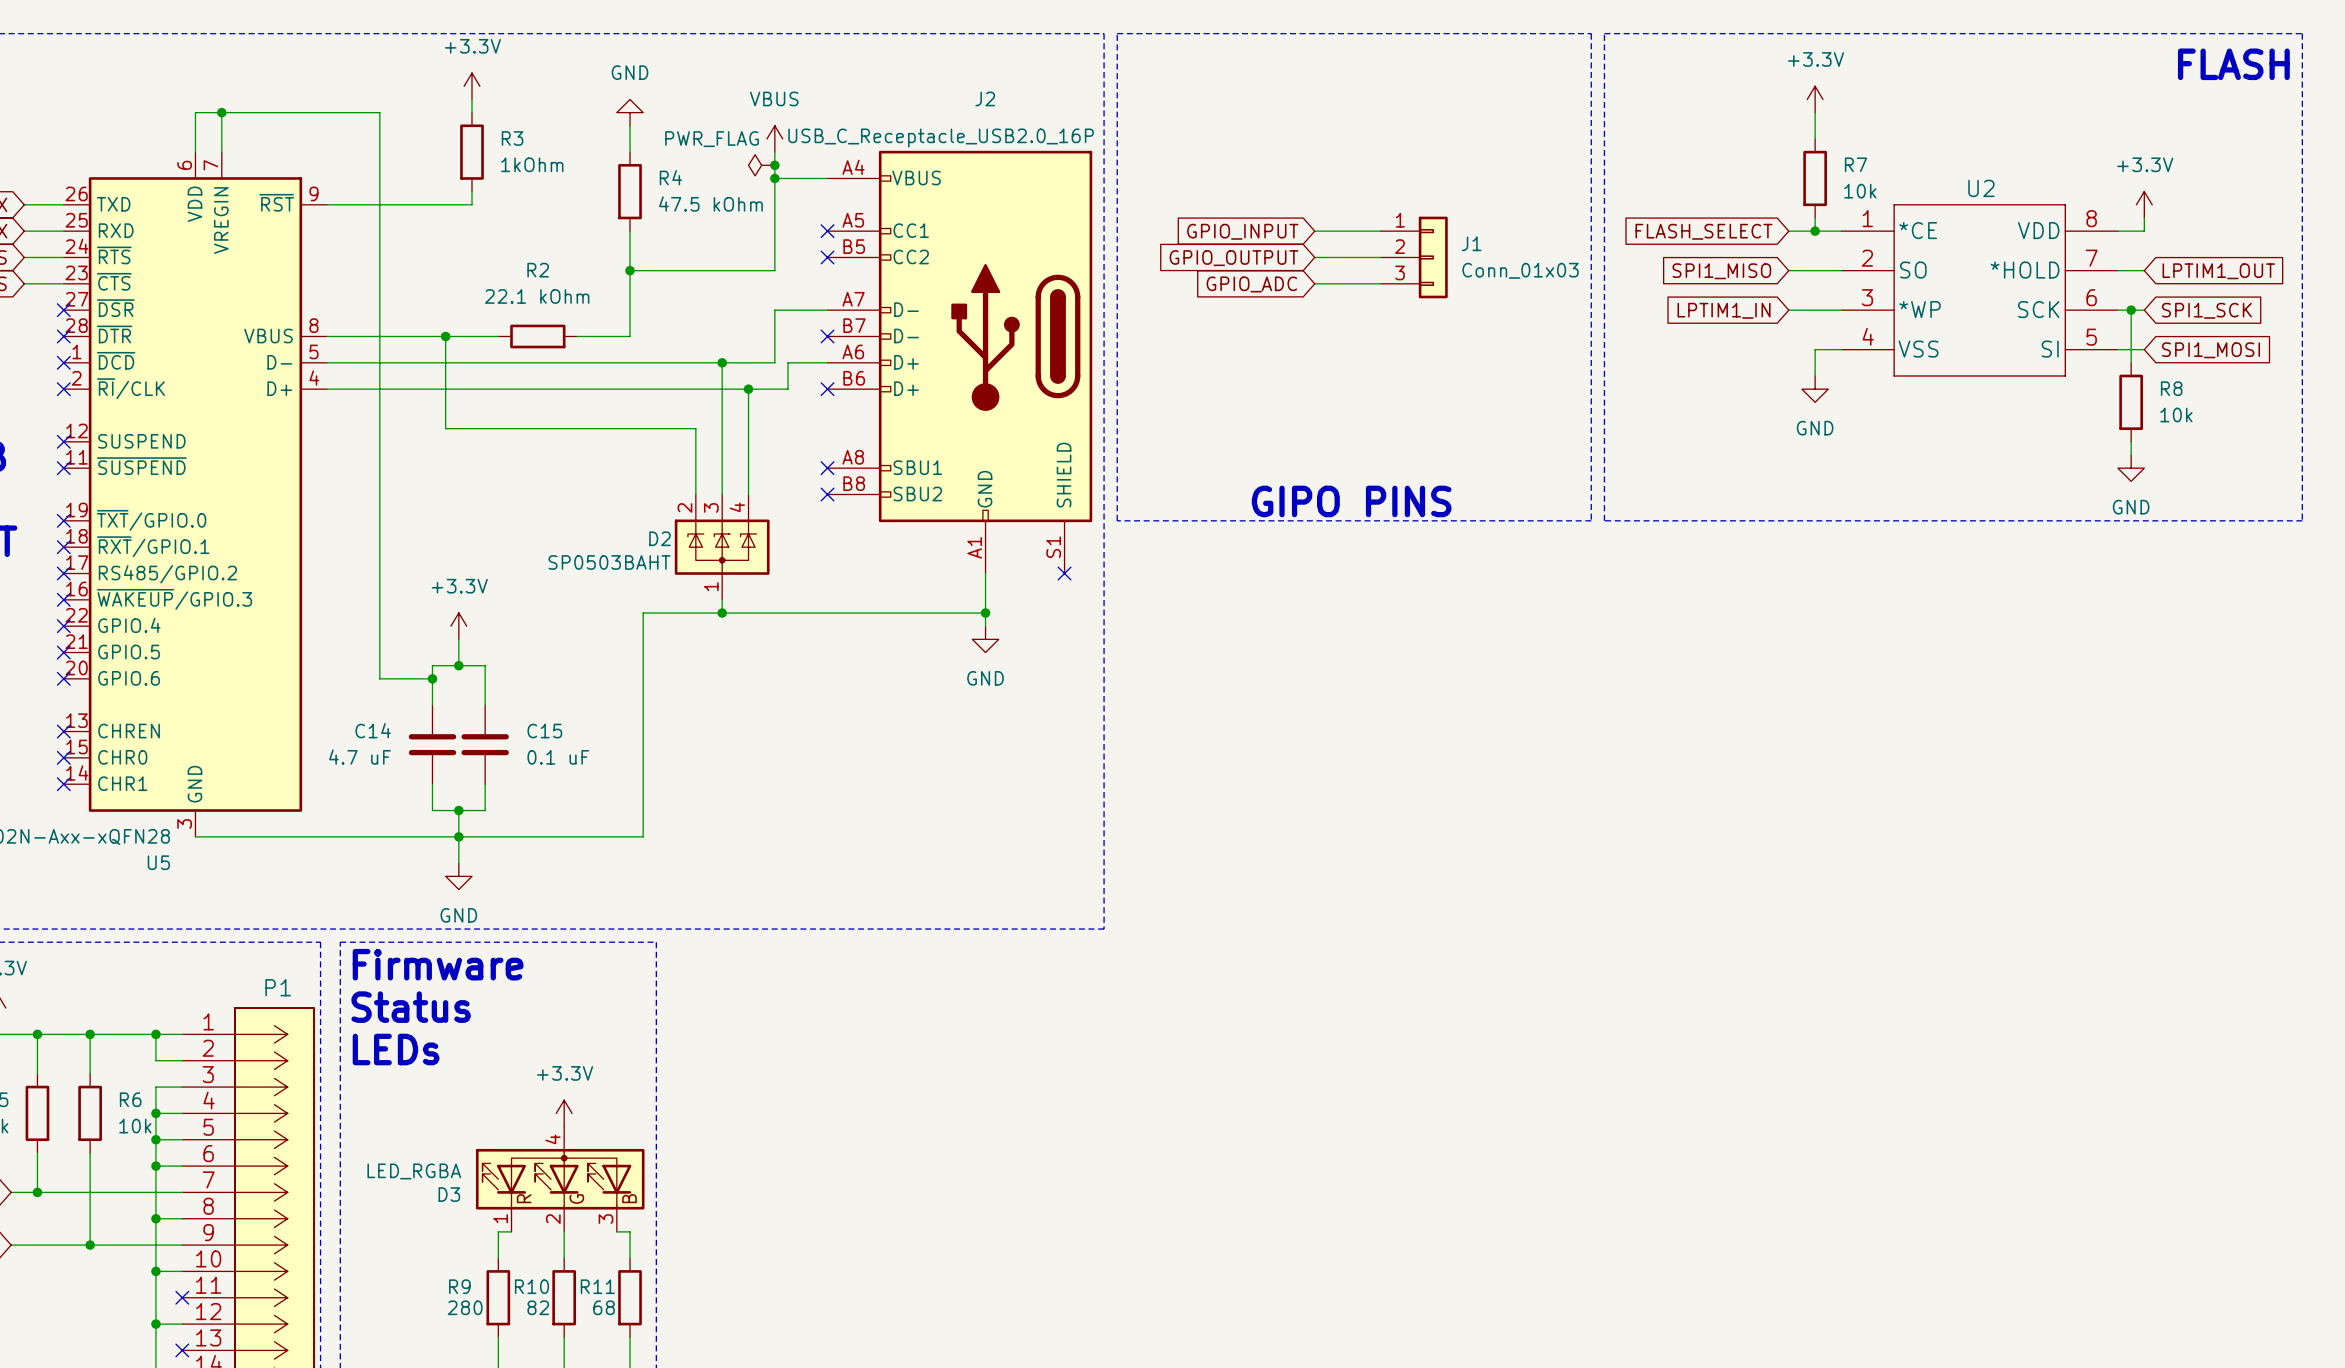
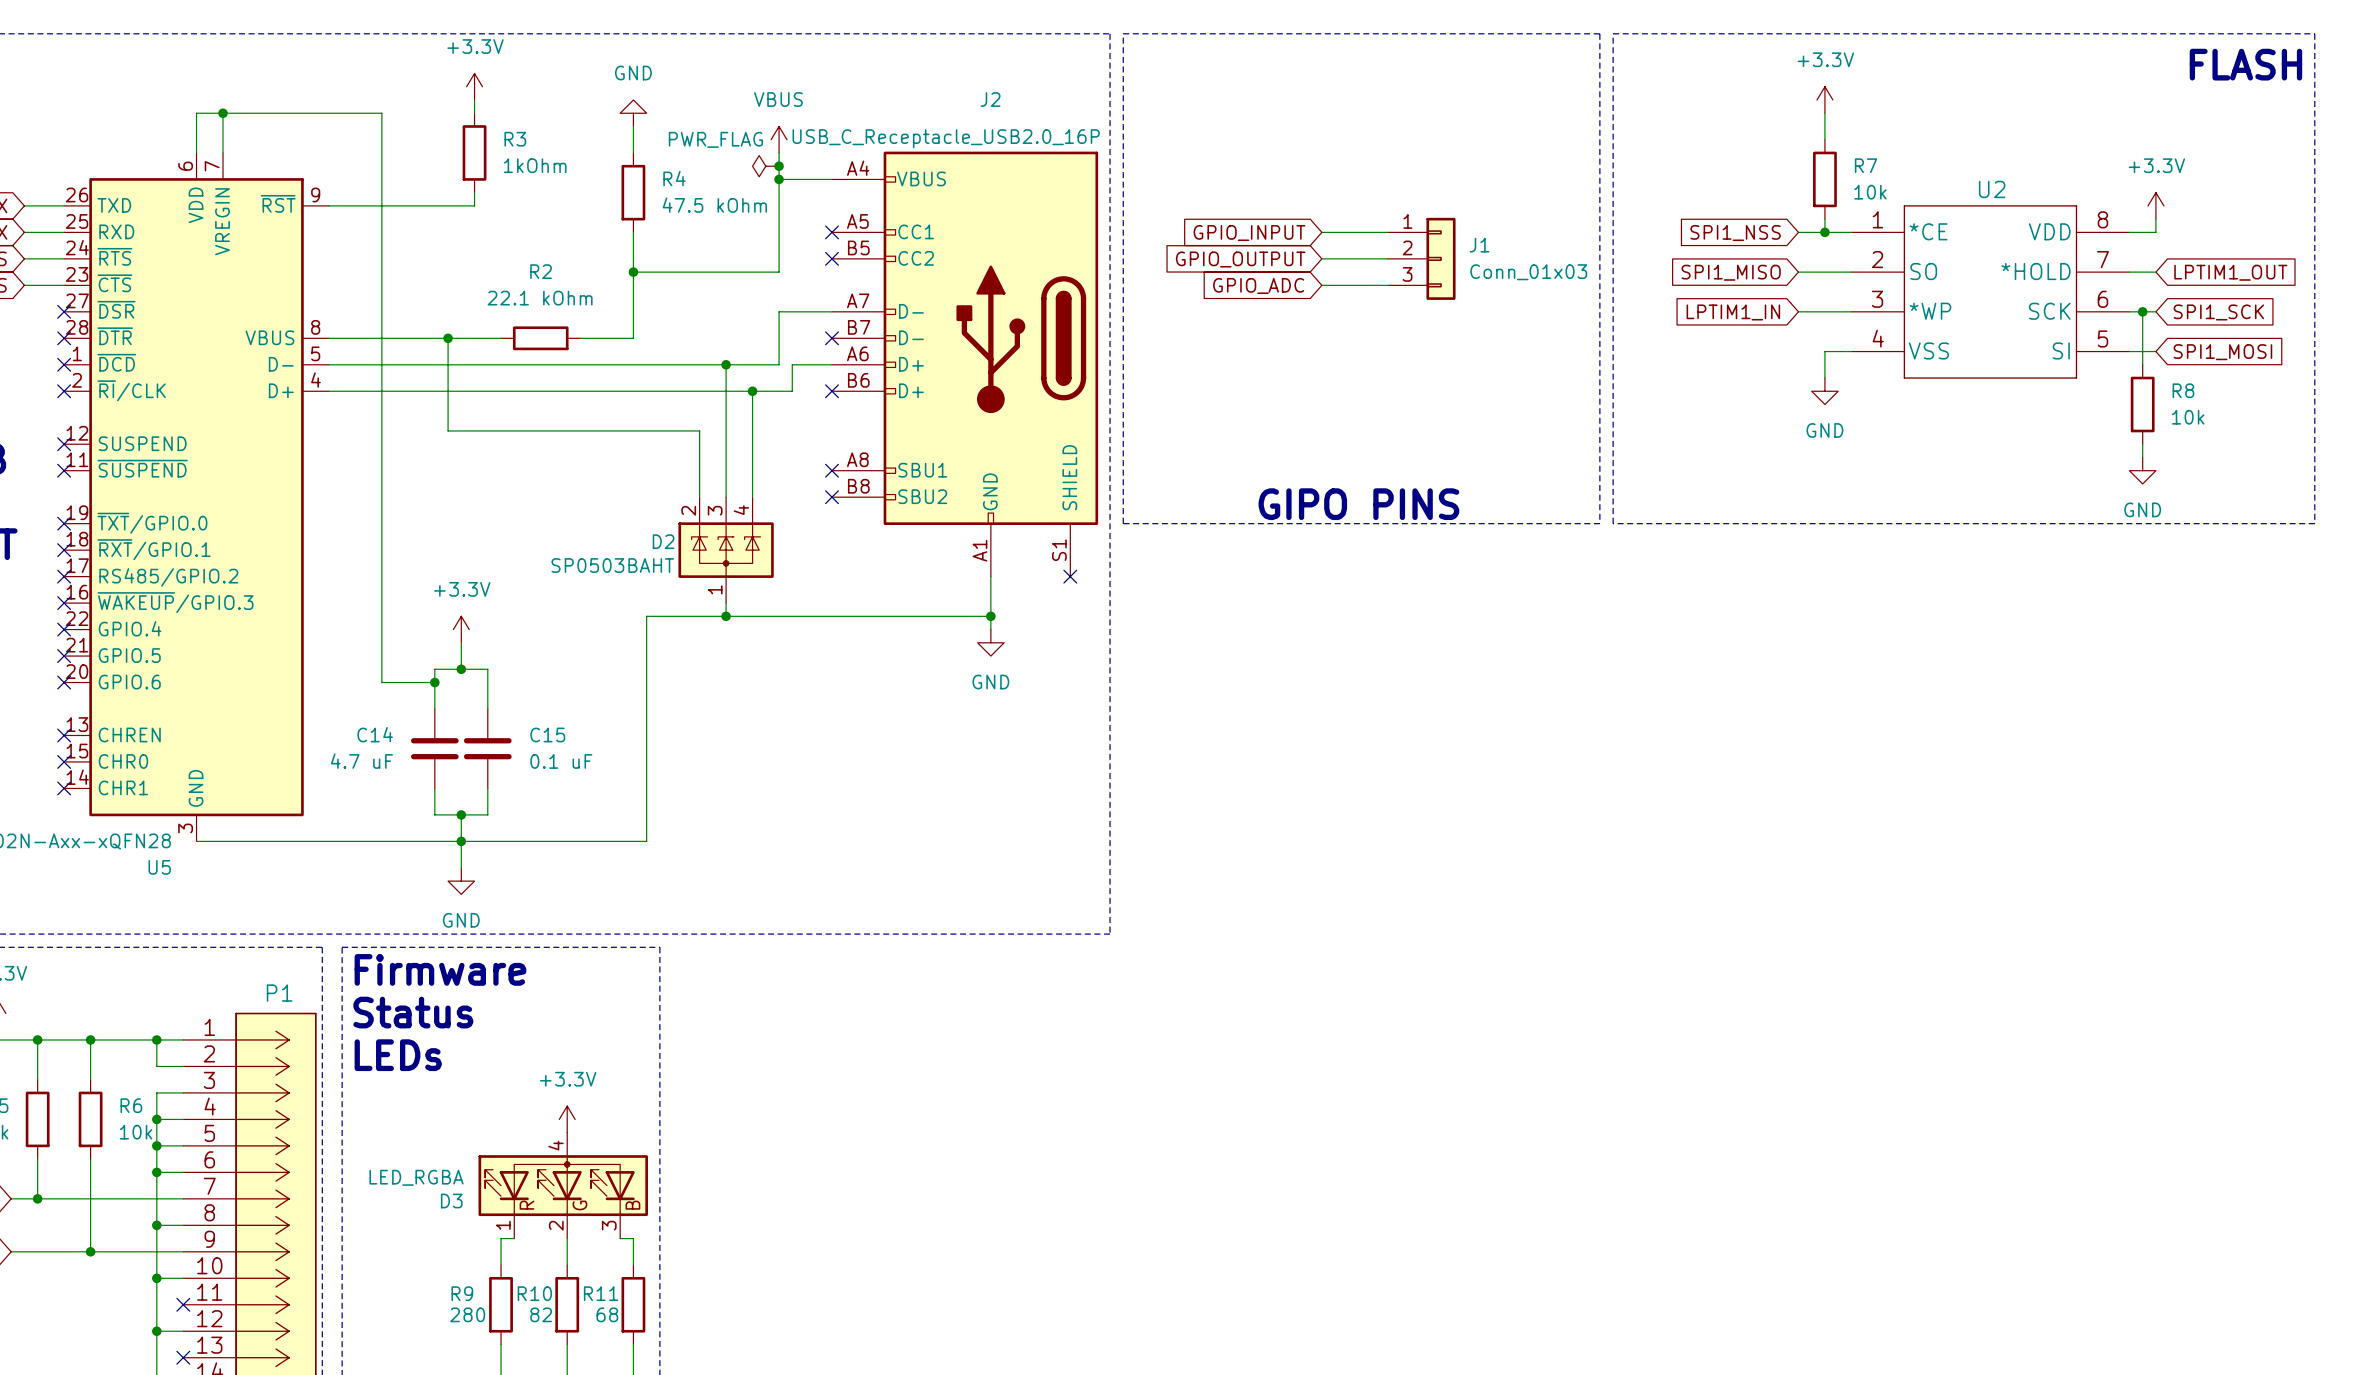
global label: FLASH_SELECT (1703, 231) -> SPI1_NSS (1735, 233)

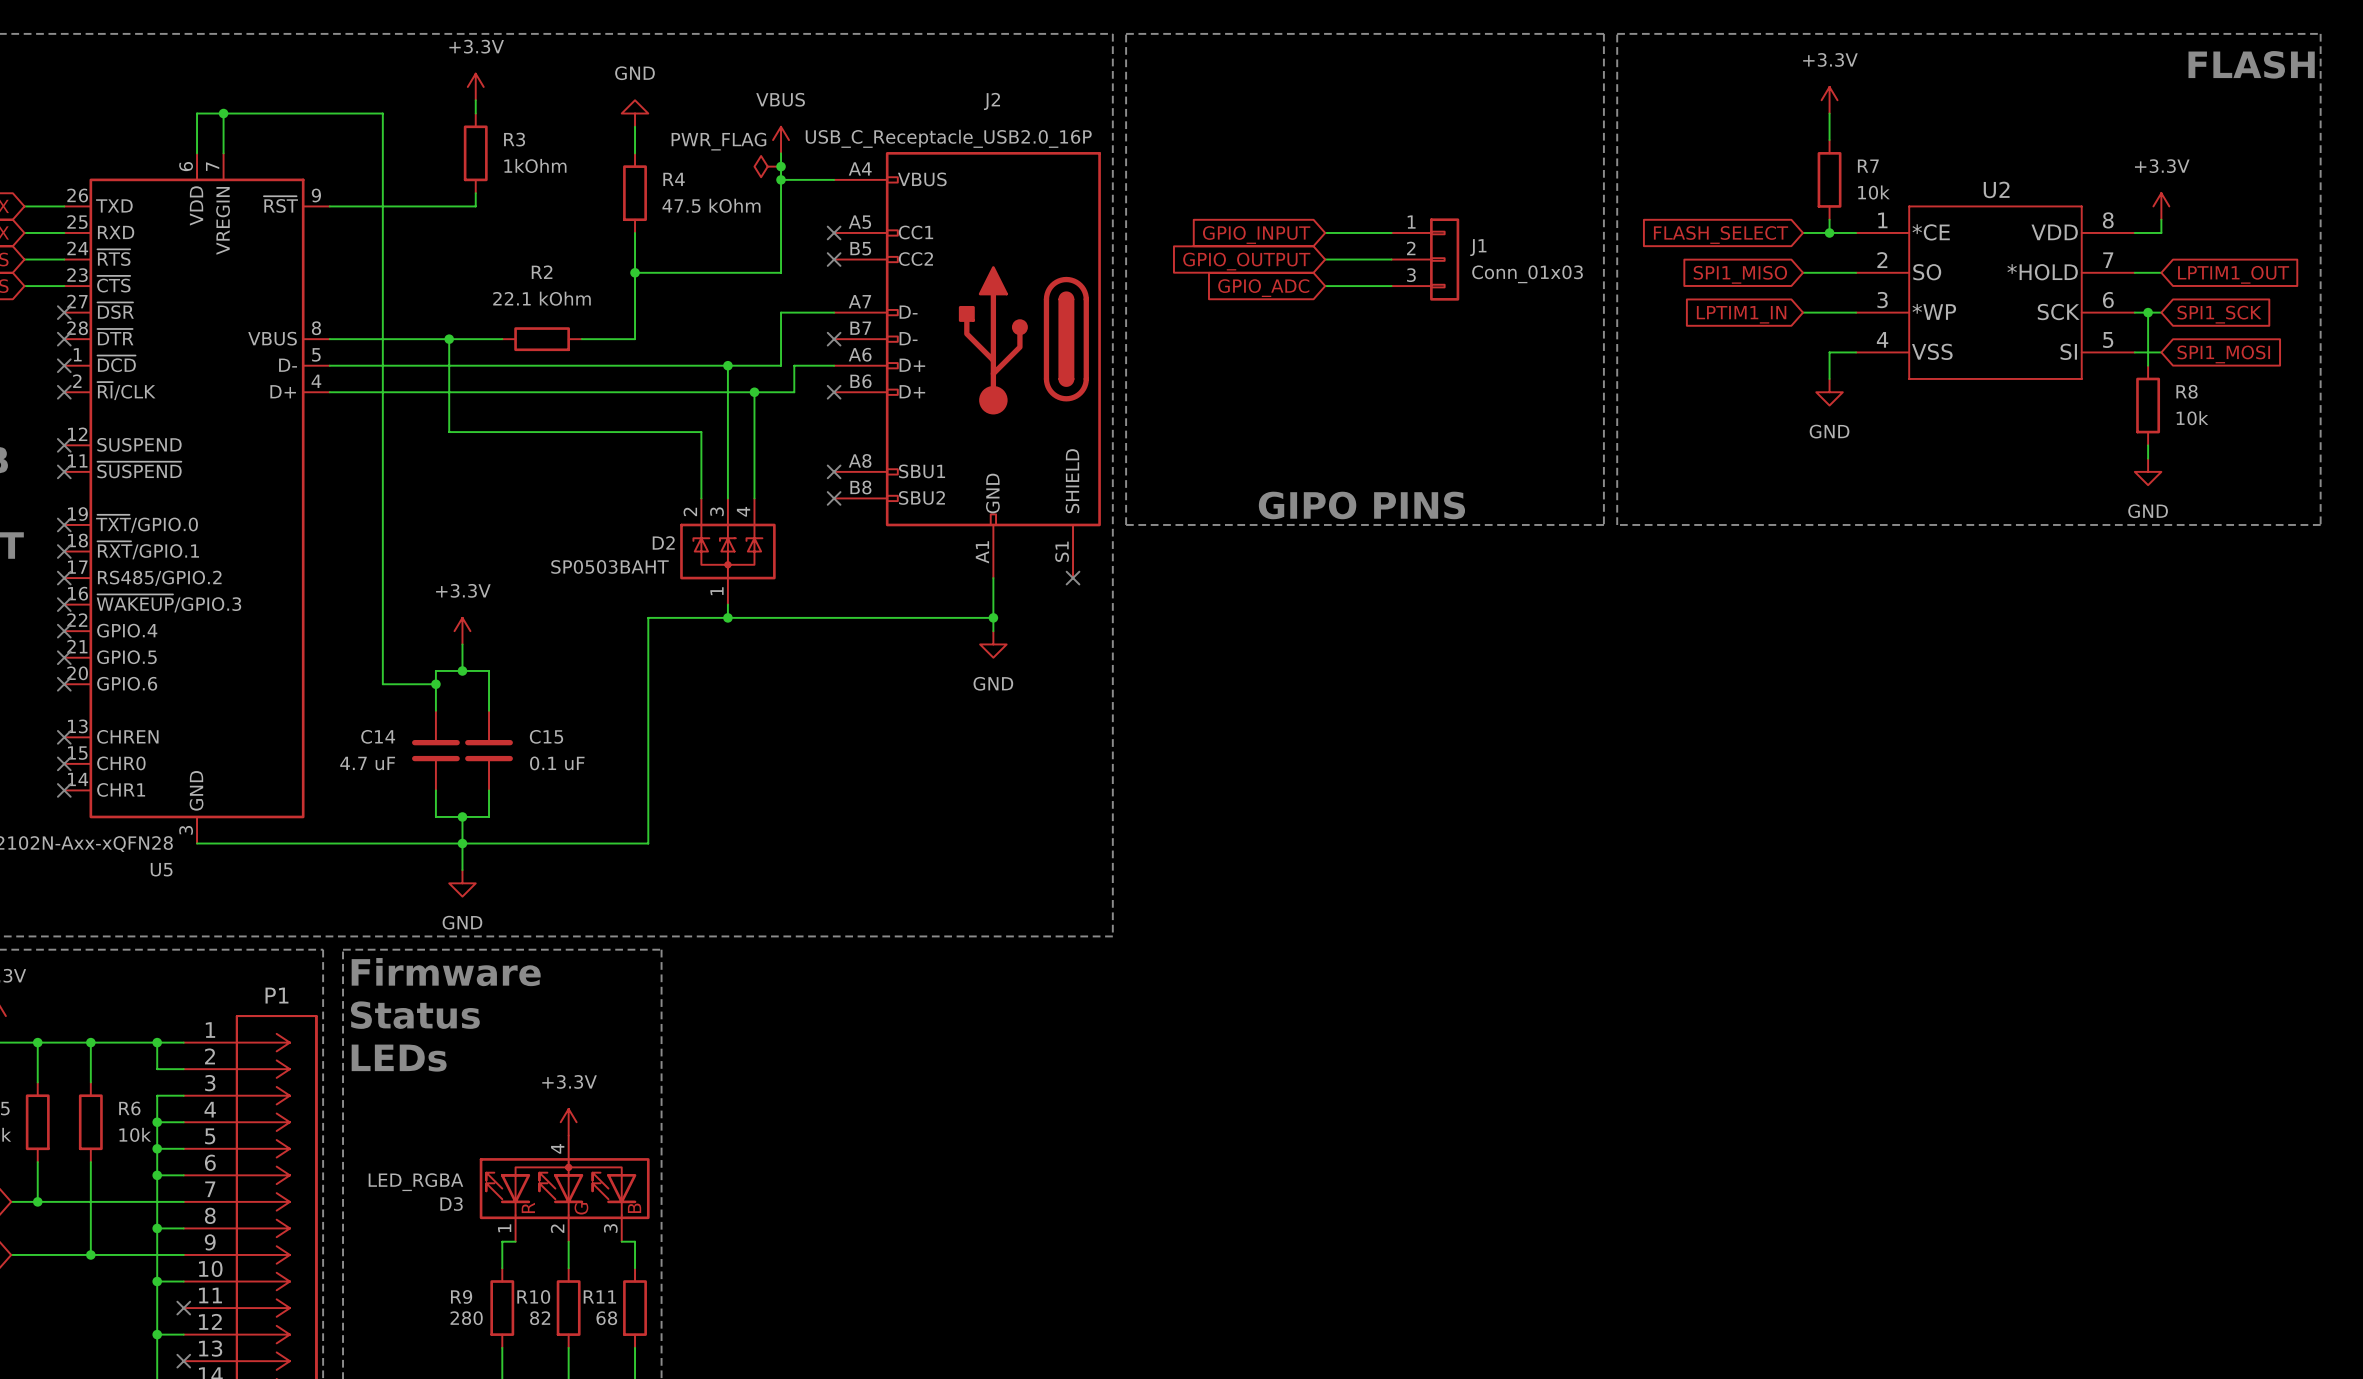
global label: SPI1_NSS (1735, 233) -> FLASH_SELECT (1721, 235)

